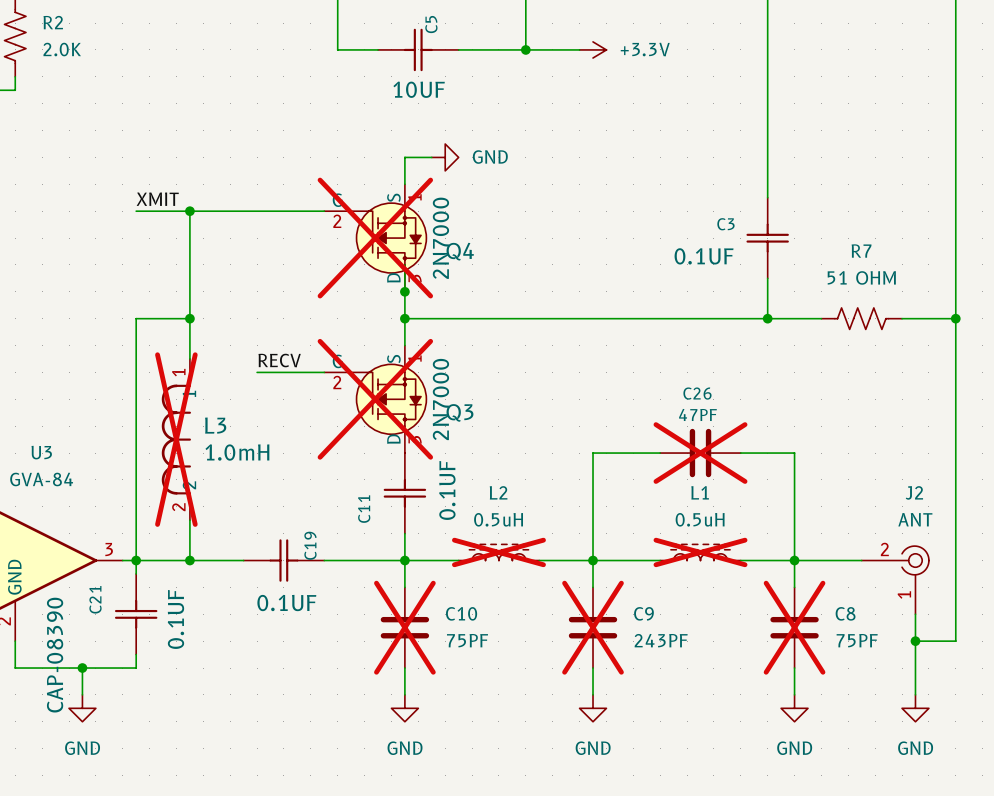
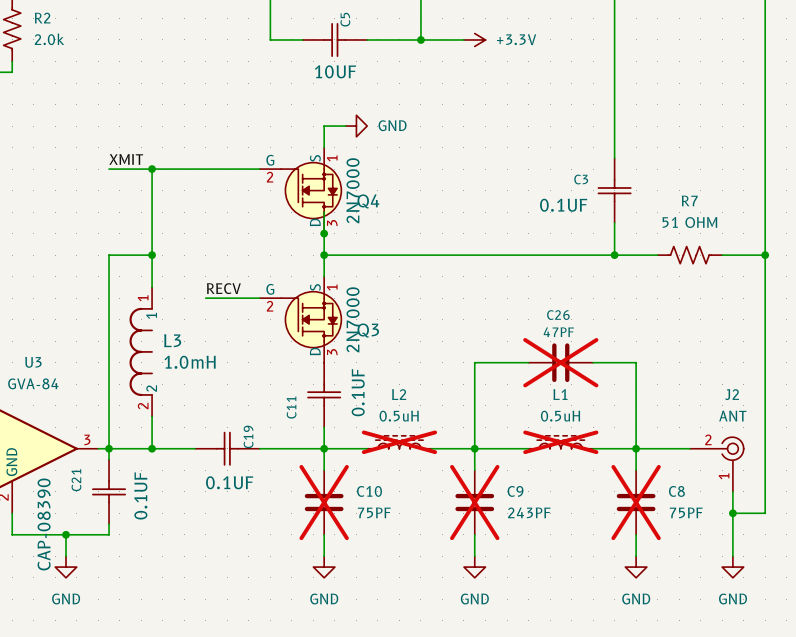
R2 value: 2.0K (62, 49) -> 2.0k (49, 39)
Q4 do-not-place cross: (375, 238) -> none
Q3 do-not-place cross: (375, 399) -> none
L3 do-not-place cross: (176, 439) -> none

